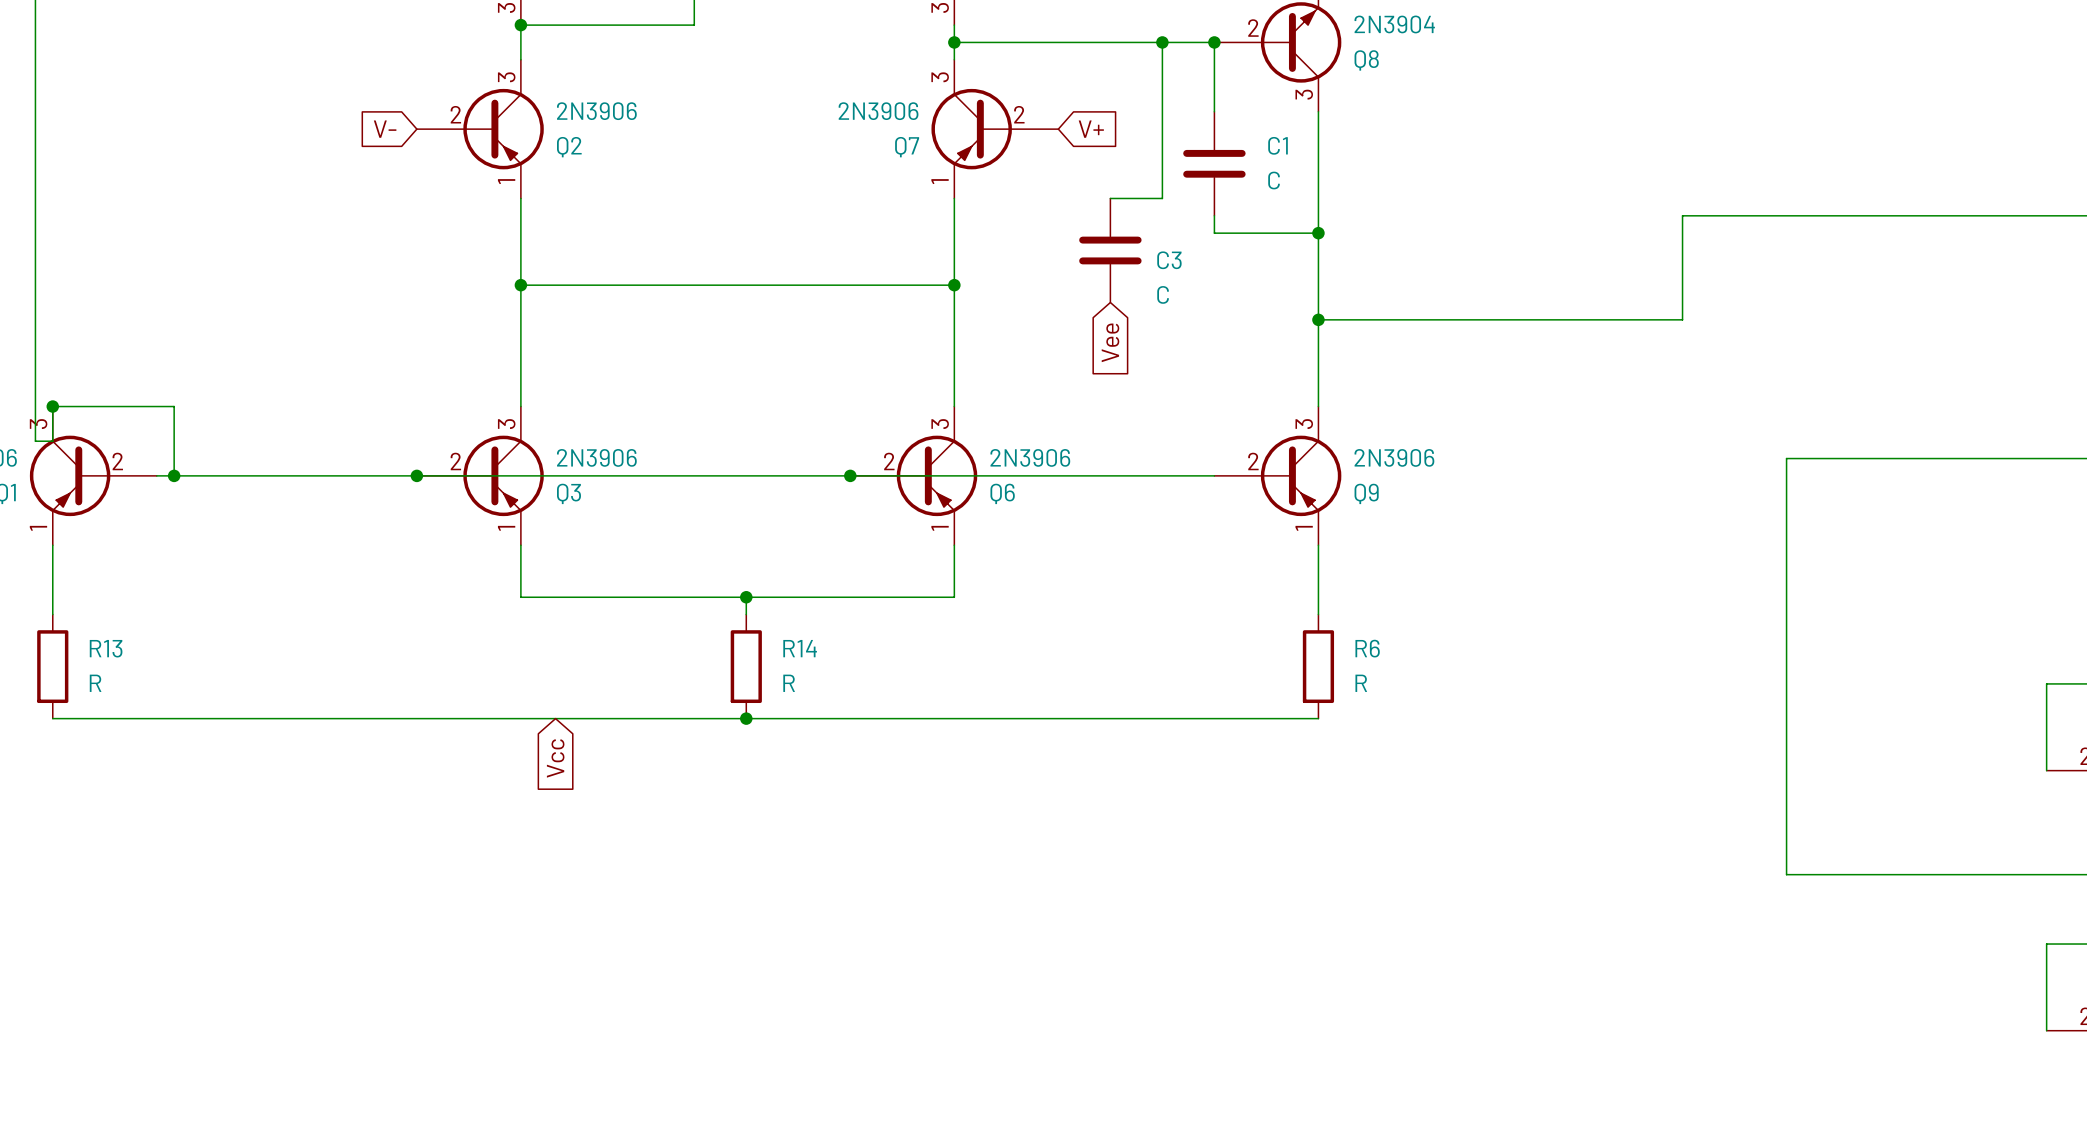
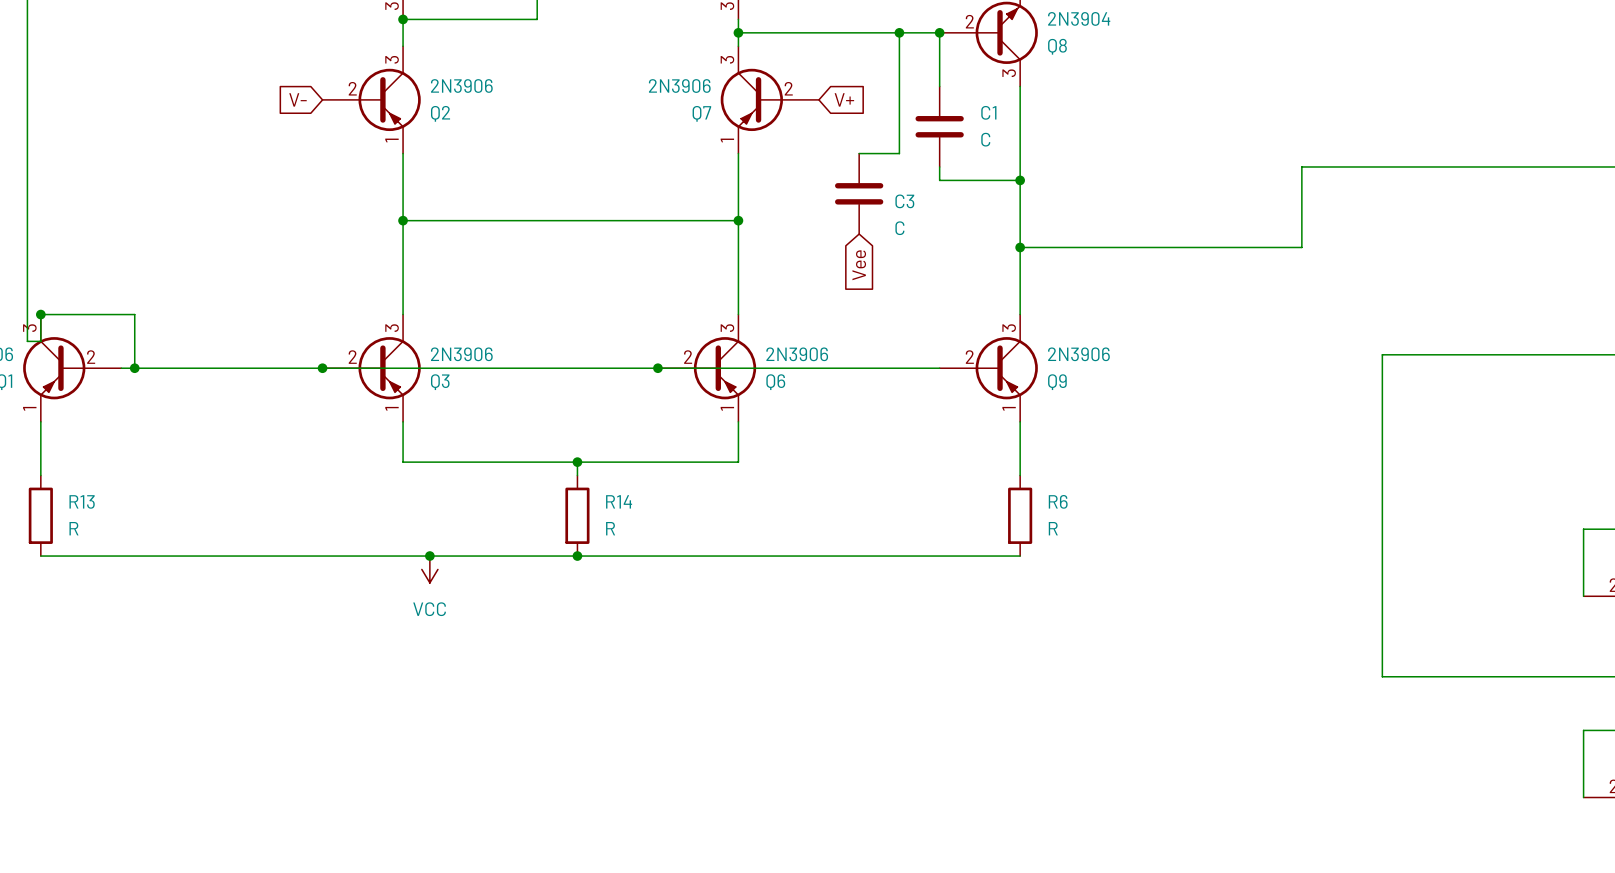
junction: none -> (429, 556)
power symbol: none -> VCC (429, 569)
global label: Vcc (555, 758) -> none

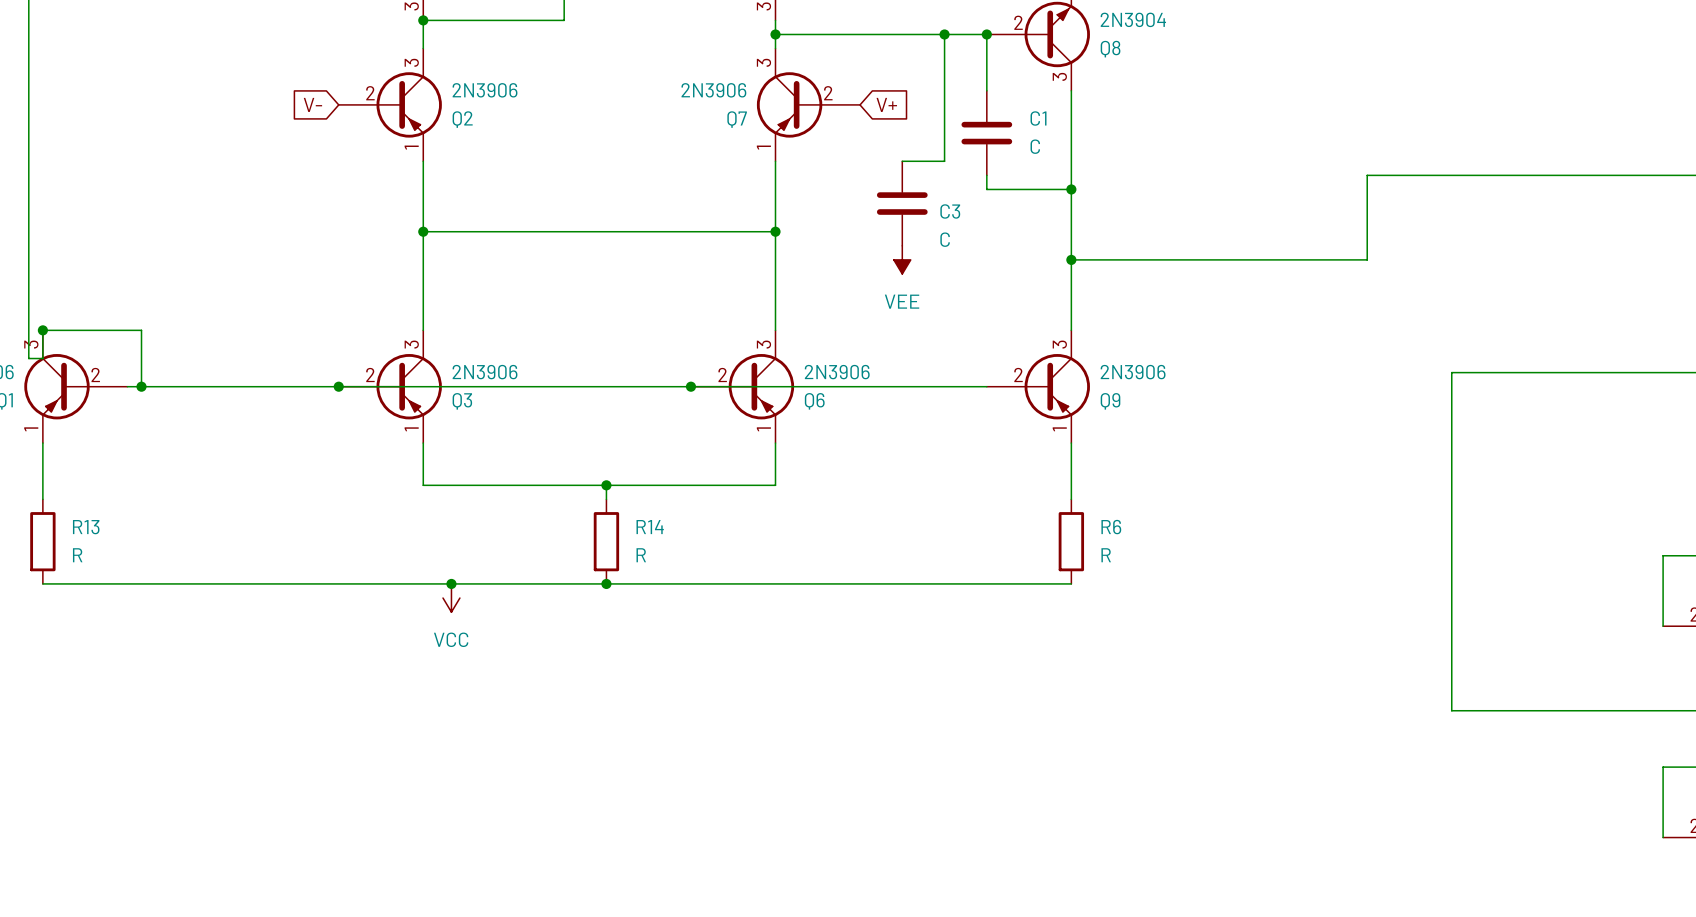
power symbol: none -> VEE (902, 259)
global label: Vee (859, 265) -> none

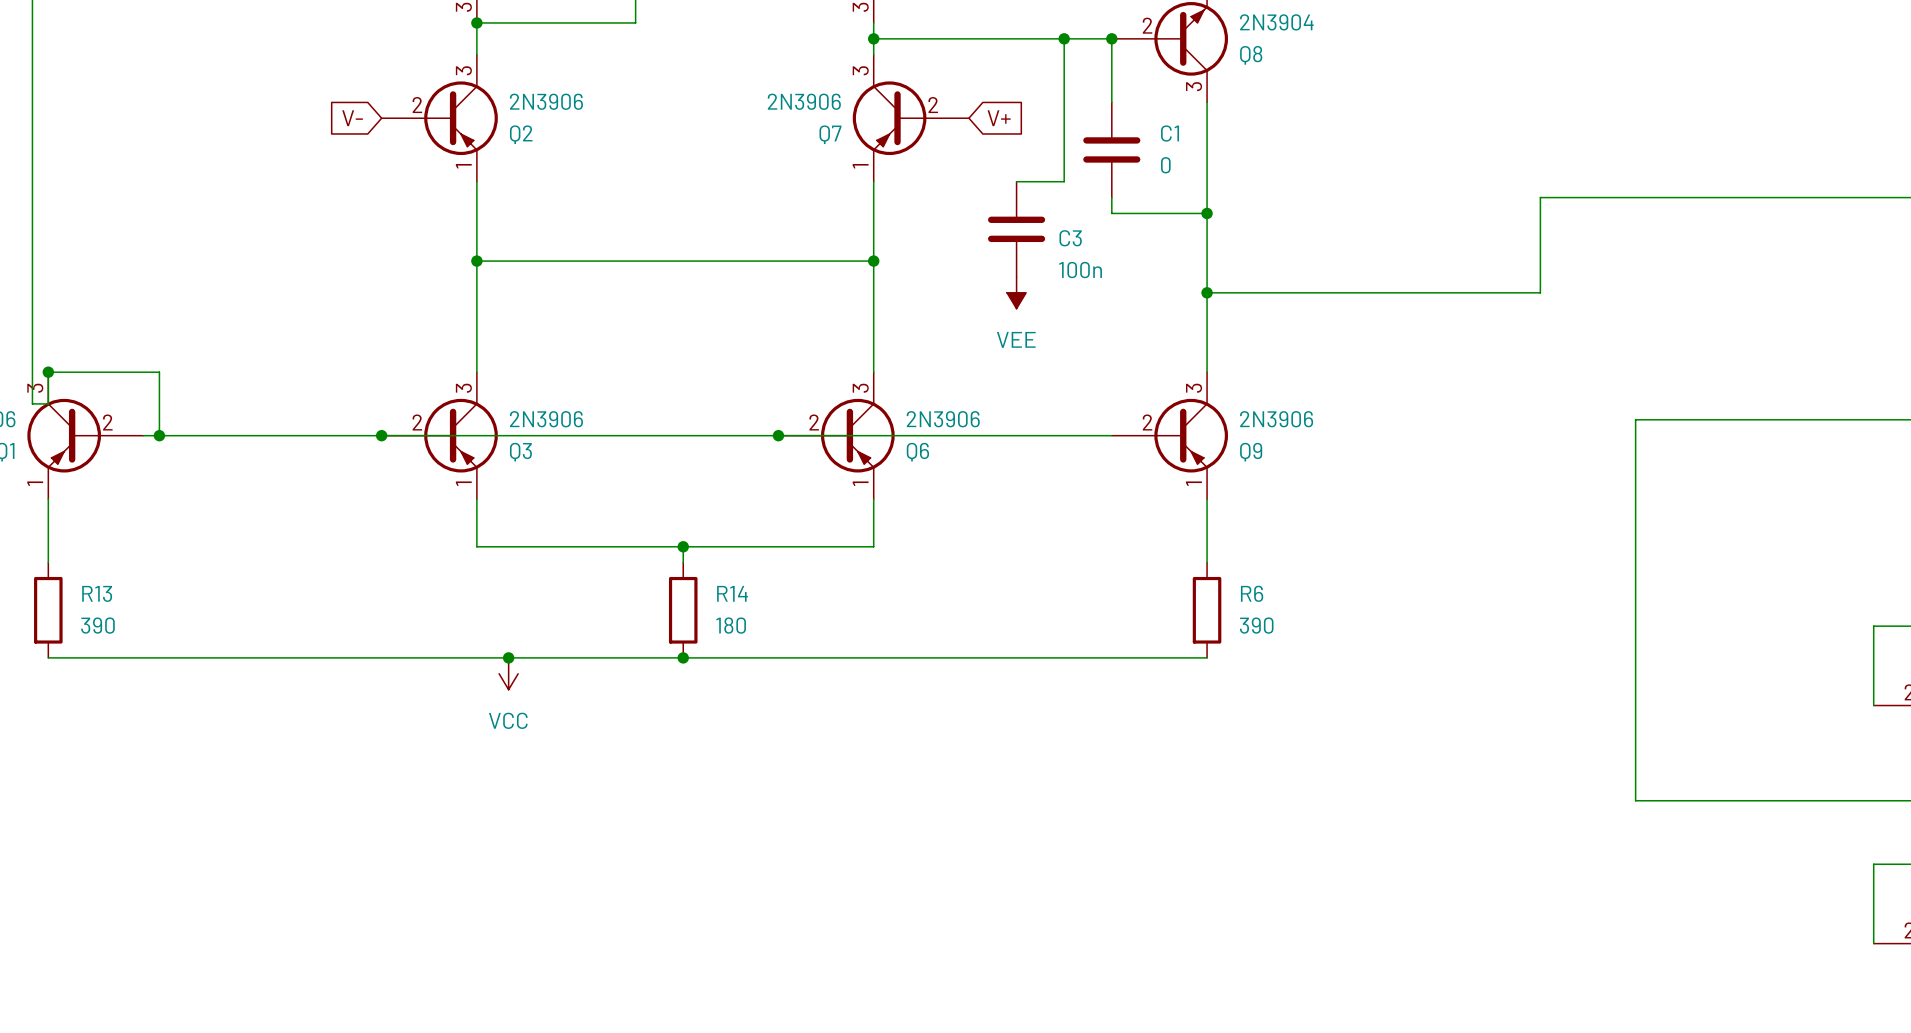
C1 value: C (1035, 146) -> 0 (1165, 165)
C3 value: C (945, 239) -> 100n (1080, 270)
R13 value: R (77, 555) -> 390 (97, 625)
R14 value: R (641, 555) -> 180 (731, 625)
R6 value: R (1106, 555) -> 390 (1256, 625)

